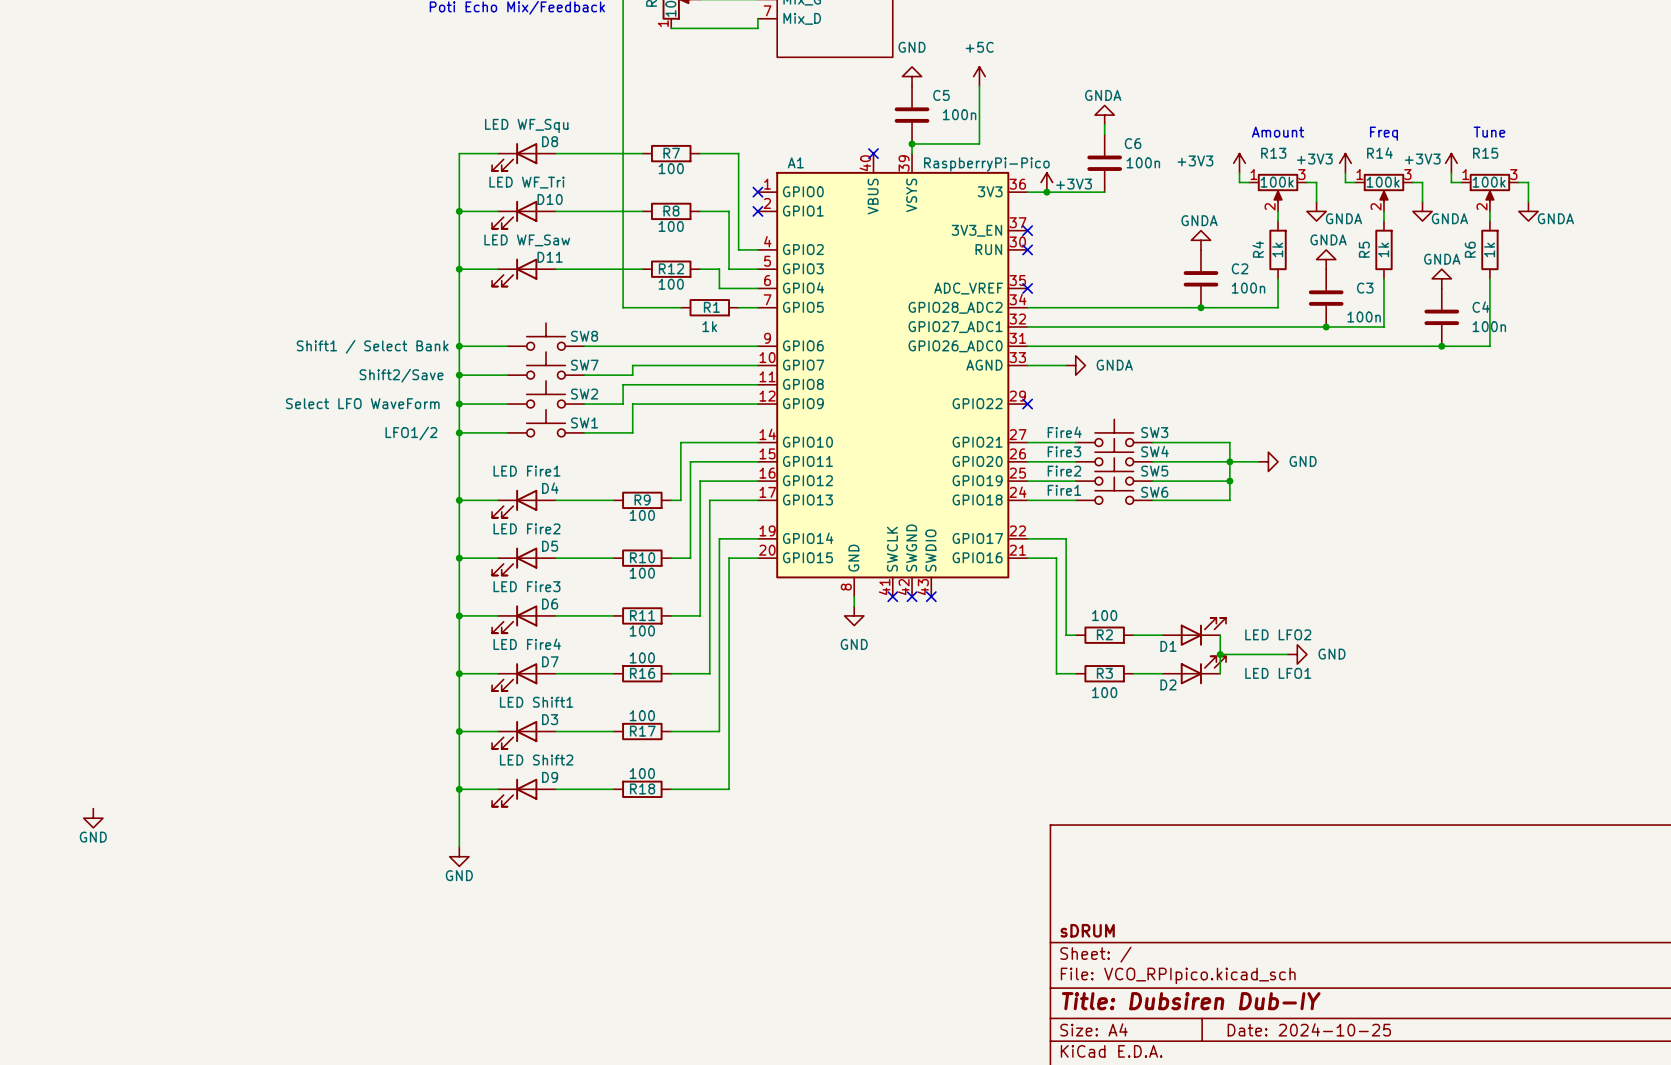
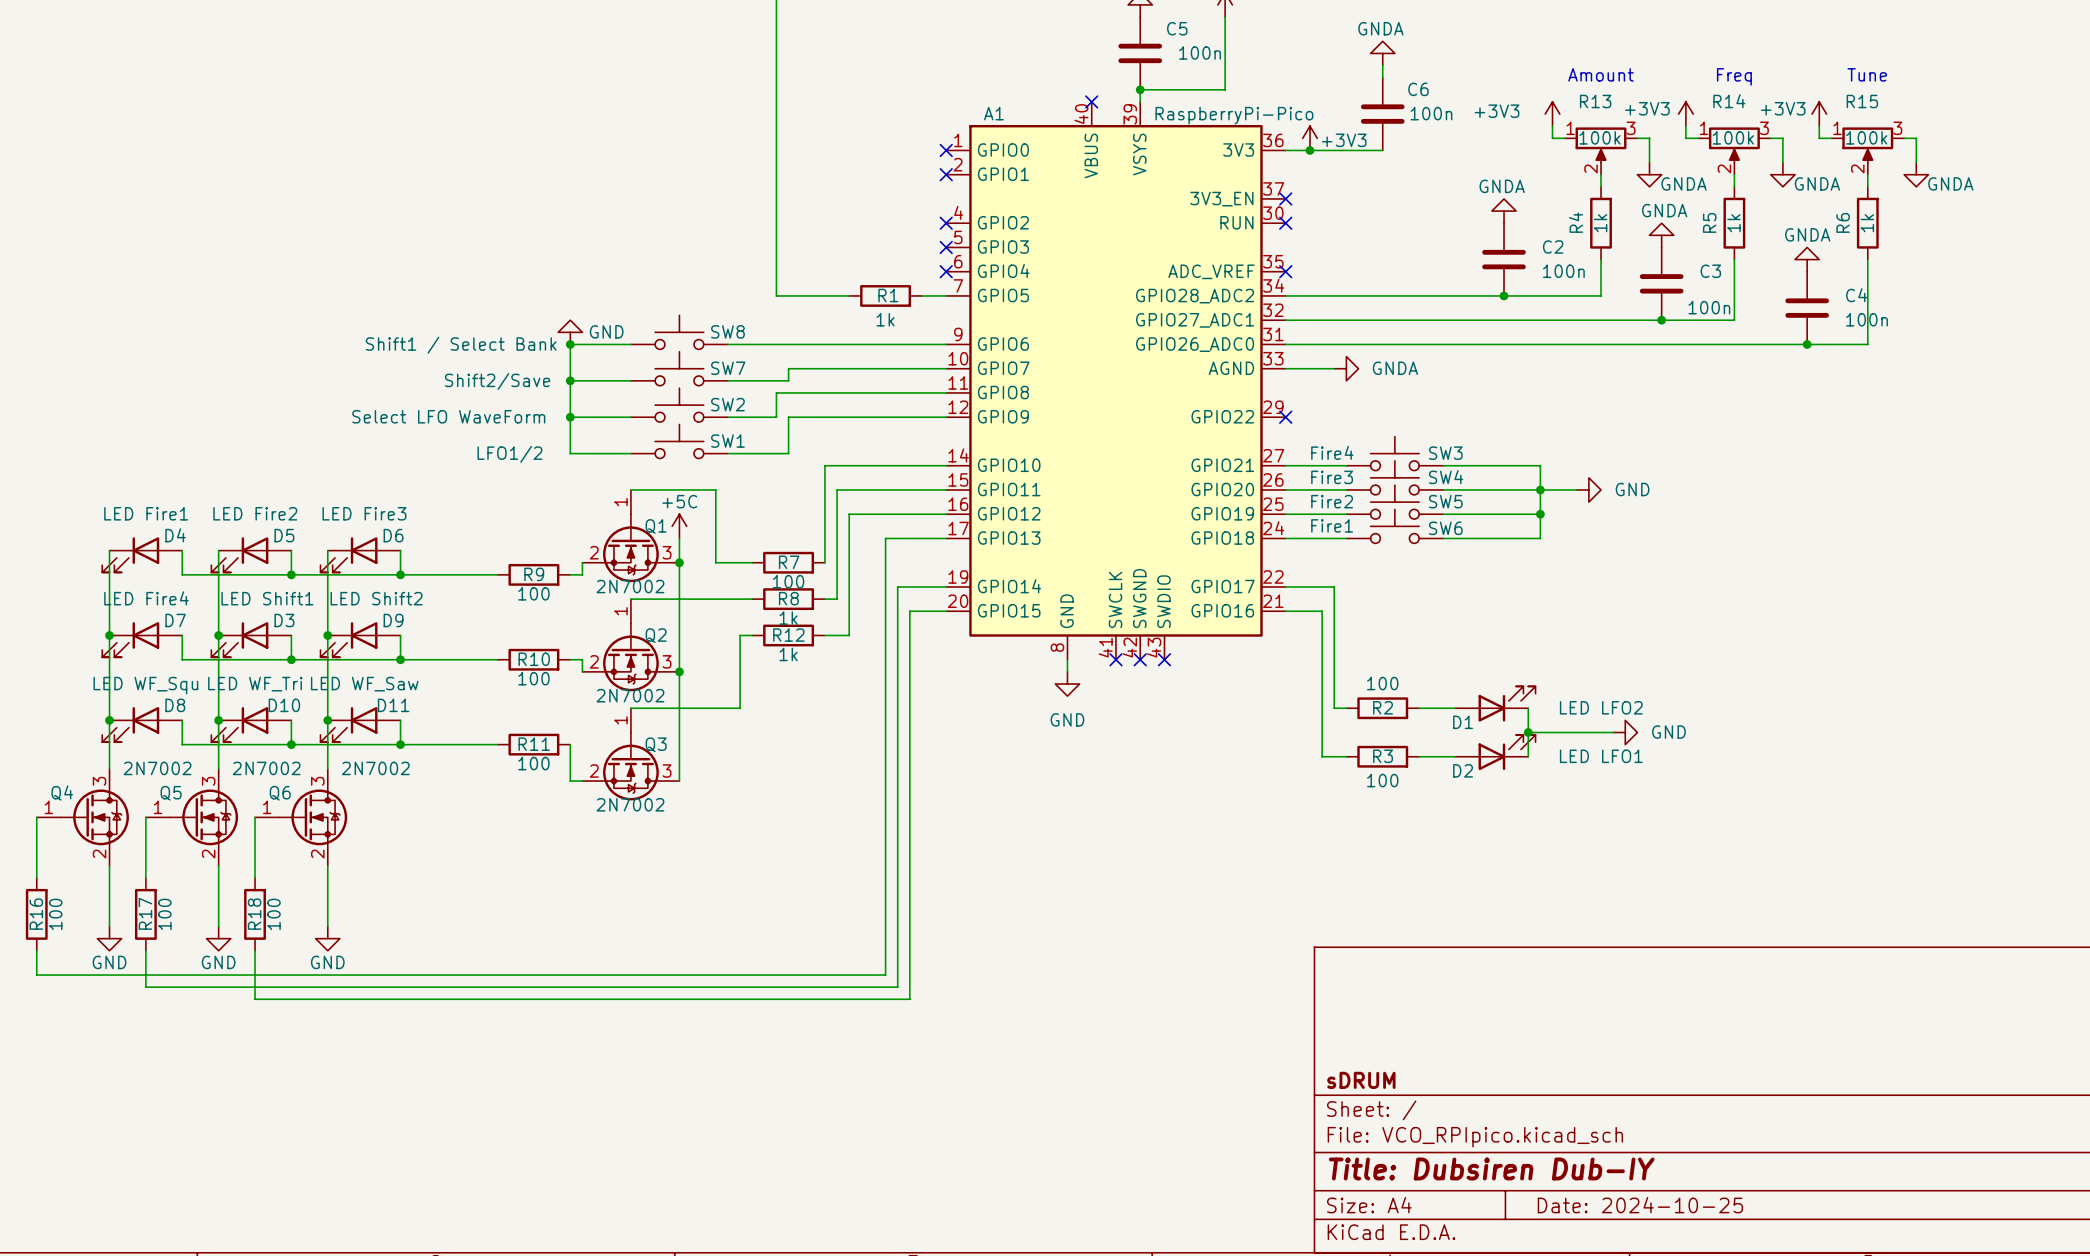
wire: (497, 153) (459, 153) (459, 346) -> none
wire: (555, 153) (642, 153) -> none
R7 position: (671, 153) -> (788, 562)
wire: (700, 153) (738, 153) (738, 249) (757, 249) -> none
D8 position: (523, 156) -> (142, 724)
wire: (459, 211) (497, 211) -> none
junction: (459, 211) -> none
wire: (555, 211) (642, 211) -> none
R8 position: (671, 211) -> (788, 599)
wire: (700, 211) (729, 211) (729, 269) (757, 269) -> none
D10 position: (523, 214) -> (251, 724)
R8 value: 100 (671, 226) -> 1k (788, 618)
no-connect mark: none -> (946, 223)
wire: (459, 269) (497, 269) -> none
junction: (459, 269) -> none
wire: (555, 269) (642, 269) -> none
R12 position: (671, 269) -> (788, 635)
wire: (700, 269) (719, 269) (719, 288) (757, 288) -> none
no-connect mark: none -> (946, 247)
D11 position: (523, 272) -> (360, 724)
R12 value: 100 (671, 284) -> 1k (788, 654)
no-connect mark: none -> (946, 271)
power symbol: none -> GND (570, 332)
wire: (459, 432) (459, 664) -> none
junction: (459, 432) -> none
wire: (680, 442) (680, 481) -> (849, 465) (824, 465) (824, 562)
wire: none -> (630, 489) (715, 489) (715, 562) (752, 562)
wire: (690, 461) (690, 558) (671, 558) -> (861, 489) (837, 489) (837, 599) (824, 599)
wire: (700, 481) (700, 615) (671, 615) -> (873, 514) (849, 514)
power symbol: none -> +5C (679, 526)
Q1: none -> 2N7002 (630, 536)
wire: (459, 500) (497, 500) -> none
junction: (459, 500) -> none
wire: none -> (679, 538) (679, 781)
wire: (555, 500) (613, 500) -> none
R9 position: (642, 500) -> (533, 574)
wire: (671, 500) (680, 500) -> (824, 635) (849, 635) (849, 538)
D4 position: (523, 503) -> (142, 554)
wire: none -> (109, 550) (109, 768)
wire: none -> (182, 550) (182, 574) (497, 574)
wire: none -> (218, 550) (218, 768)
wire: none -> (291, 550) (291, 574)
wire: none -> (327, 550) (327, 768)
wire: none -> (400, 550) (400, 574)
wire: none -> (582, 562) (582, 574) (570, 574)
junction: none -> (679, 562)
junction: none -> (291, 574)
junction: none -> (400, 574)
wire: none -> (630, 599) (752, 599)
wire: (459, 558) (497, 558) -> none
junction: (459, 558) -> none
wire: (555, 558) (613, 558) -> none
R10 position: (642, 558) -> (533, 659)
D5 position: (523, 561) -> (251, 554)
junction: none -> (109, 635)
wire: none -> (182, 635) (182, 659) (497, 659)
junction: none -> (218, 635)
wire: none -> (291, 635) (291, 659)
junction: none -> (327, 635)
wire: none -> (400, 635) (400, 659)
wire: none -> (752, 635) (740, 635) (740, 708) (630, 708)
Q2: none -> 2N7002 (630, 645)
junction: none -> (291, 659)
junction: none -> (400, 659)
wire: none -> (570, 659) (582, 659) (582, 671)
junction: none -> (679, 671)
wire: (459, 615) (497, 615) -> none
junction: (459, 615) -> none
wire: (555, 615) (613, 615) -> none
R11 position: (642, 615) -> (533, 744)
D6 position: (523, 619) -> (360, 554)
junction: none -> (109, 720)
wire: none -> (182, 720) (182, 744) (497, 744)
junction: none -> (218, 720)
wire: none -> (291, 720) (291, 744)
junction: none -> (327, 720)
wire: none -> (400, 720) (400, 744)
junction: none -> (291, 744)
junction: none -> (400, 744)
Q3: none -> 2N7002 (630, 754)
wire: (459, 673) (497, 673) -> none
junction: (459, 673) -> none
wire: (555, 673) (613, 673) -> none
R16 rotation: 0° (642, 673) -> 90° clockwise (36, 914)
R16 position: (642, 673) -> (36, 914)
wire: (671, 673) (709, 673) -> (36, 950) (36, 975) (885, 975) (885, 756)
D7 position: (523, 677) -> (142, 639)
wire: (459, 692) (459, 847) -> (570, 781) (582, 781)
wire: none -> (36, 817) (36, 878)
Q4: none -> 2N7002 (82, 817)
wire: none -> (145, 817) (145, 878)
Q5: none -> 2N7002 (191, 817)
wire: none -> (255, 817) (255, 878)
Q6: none -> 2N7002 (301, 817)
wire: (459, 731) (497, 731) -> none
junction: (459, 731) -> none
wire: (555, 731) (613, 731) -> none
R17 rotation: 0° (642, 731) -> 90° clockwise (145, 914)
R17 position: (642, 731) -> (145, 914)
wire: (671, 731) (719, 731) -> (145, 950) (145, 987) (897, 987) (897, 829)
D3 position: (523, 734) -> (251, 639)
wire: none -> (109, 865) (109, 926)
wire: none -> (218, 865) (218, 926)
wire: none -> (327, 865) (327, 926)
wire: (459, 789) (497, 789) -> none
junction: (459, 789) -> none
wire: (555, 789) (613, 789) -> none
R18 rotation: 0° (642, 789) -> 90° clockwise (255, 914)
R18 position: (642, 789) -> (255, 914)
wire: (671, 789) (729, 789) -> (255, 950) (255, 999) (909, 999) (909, 902)
D9 position: (523, 792) -> (360, 639)
power symbol: none -> GND (218, 938)
power symbol: none -> GND (327, 938)
power symbol: GND (459, 856) -> none

